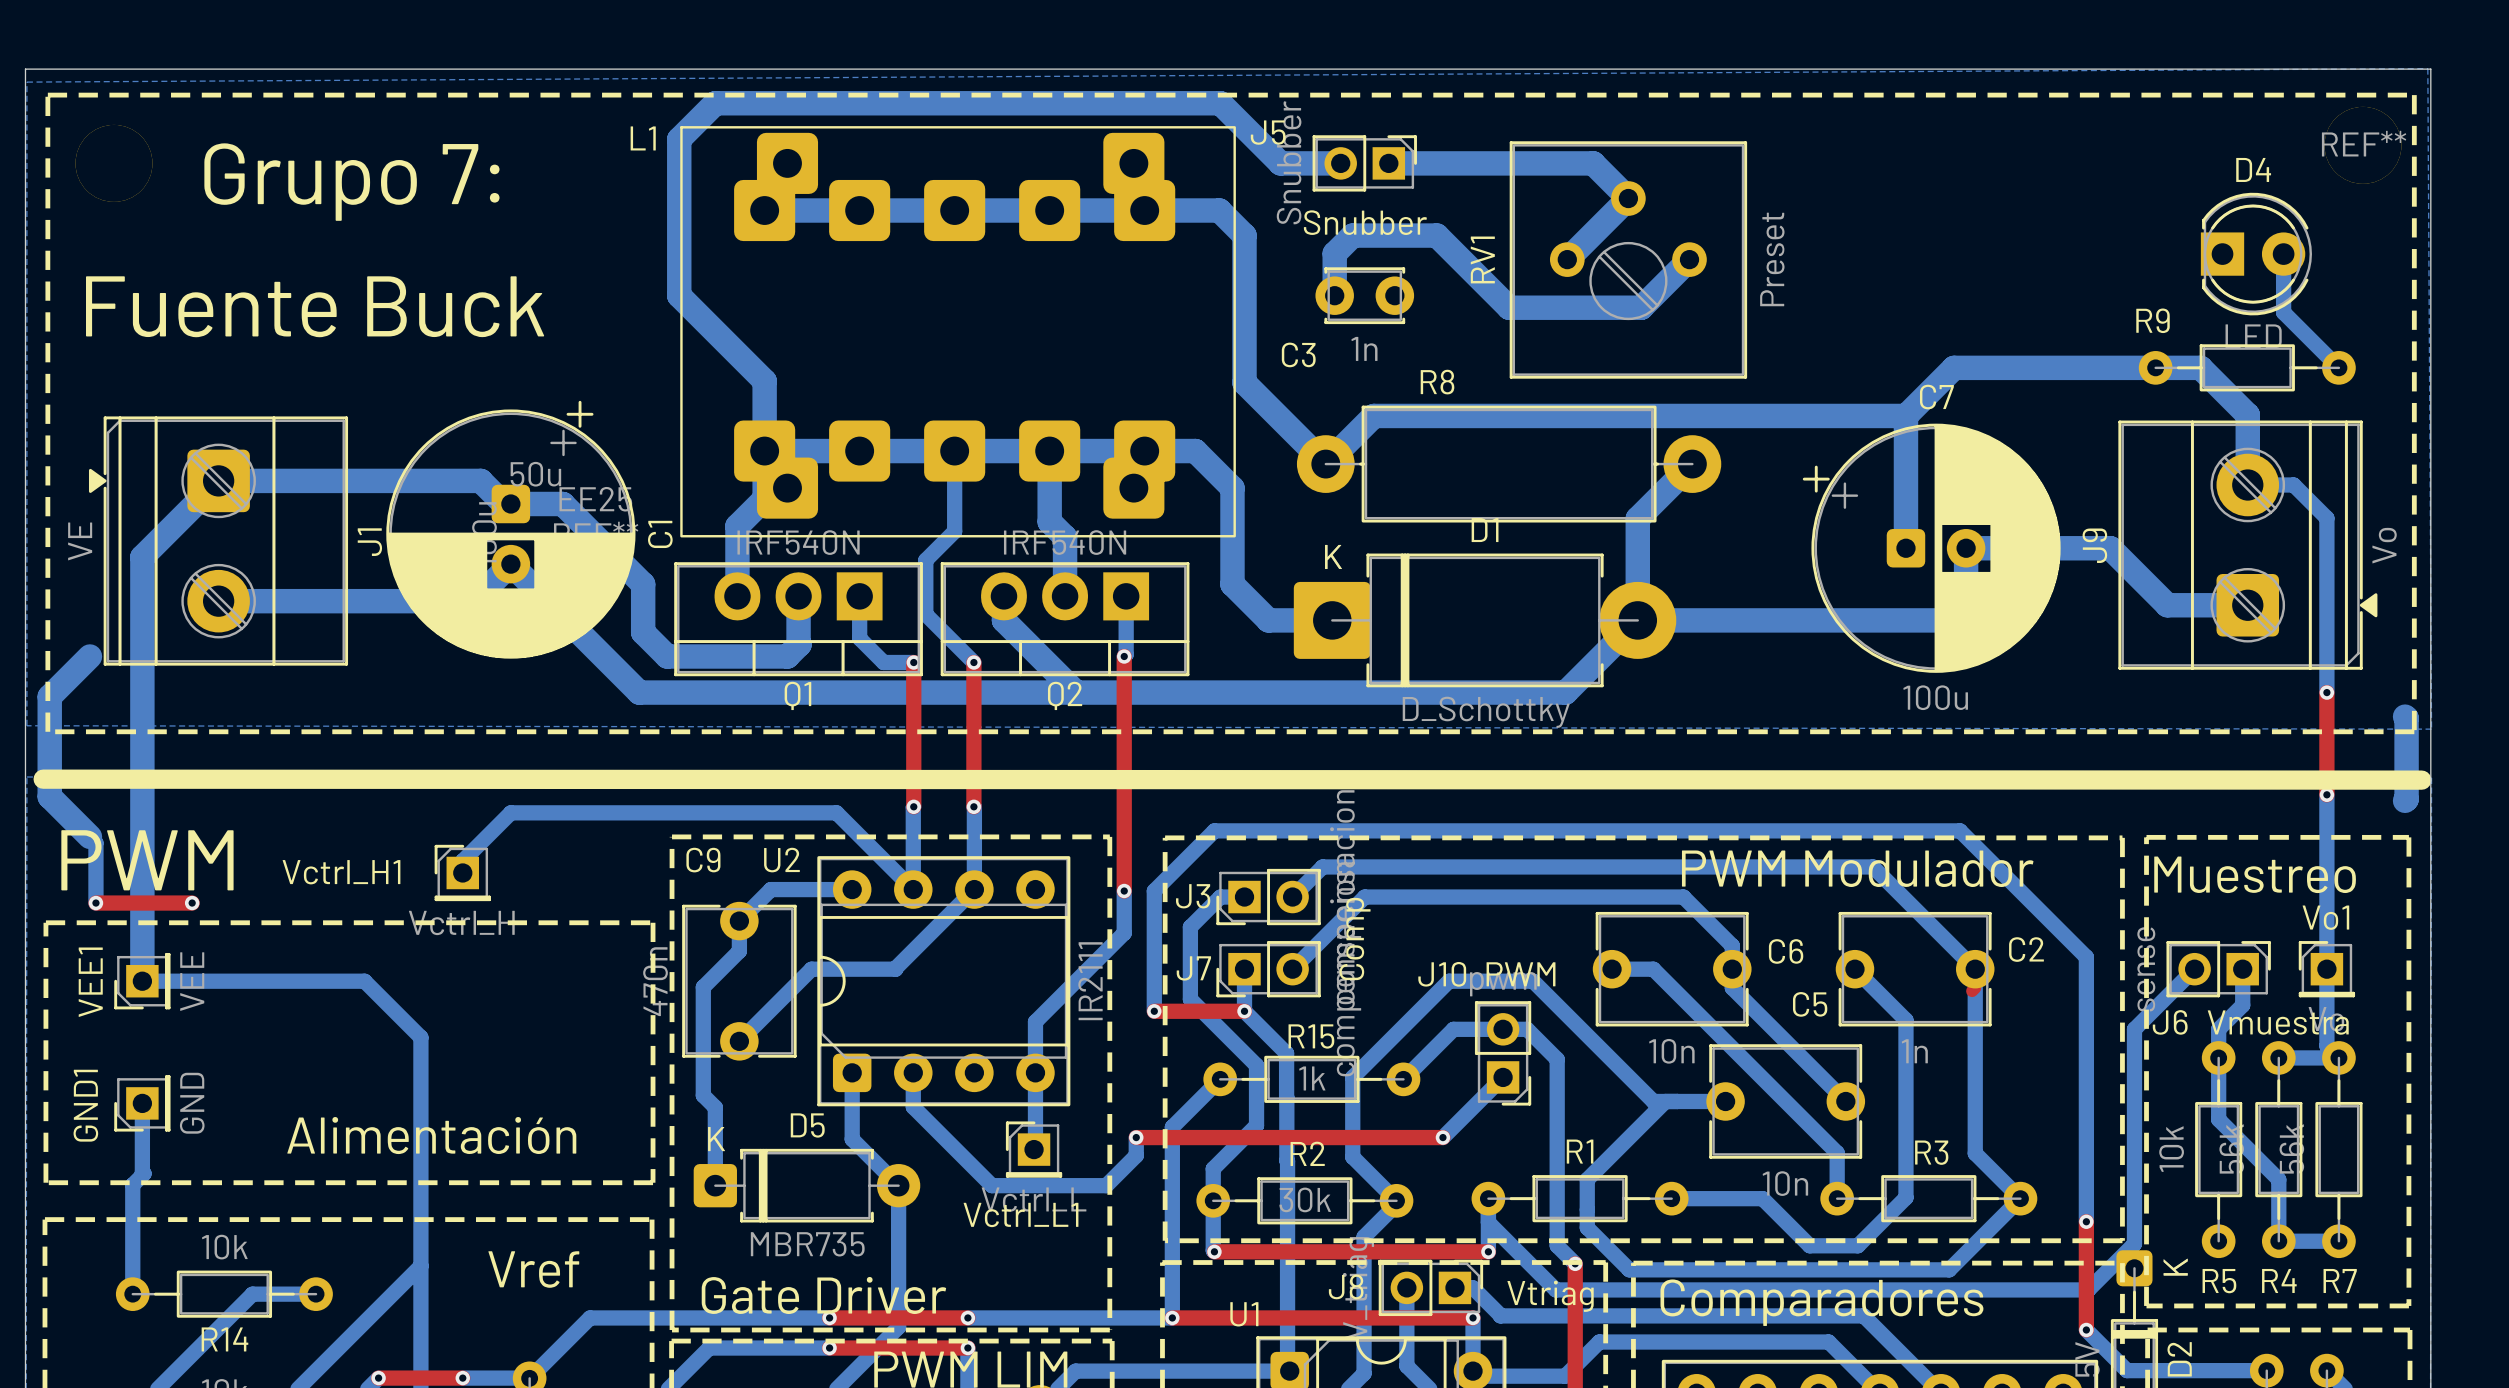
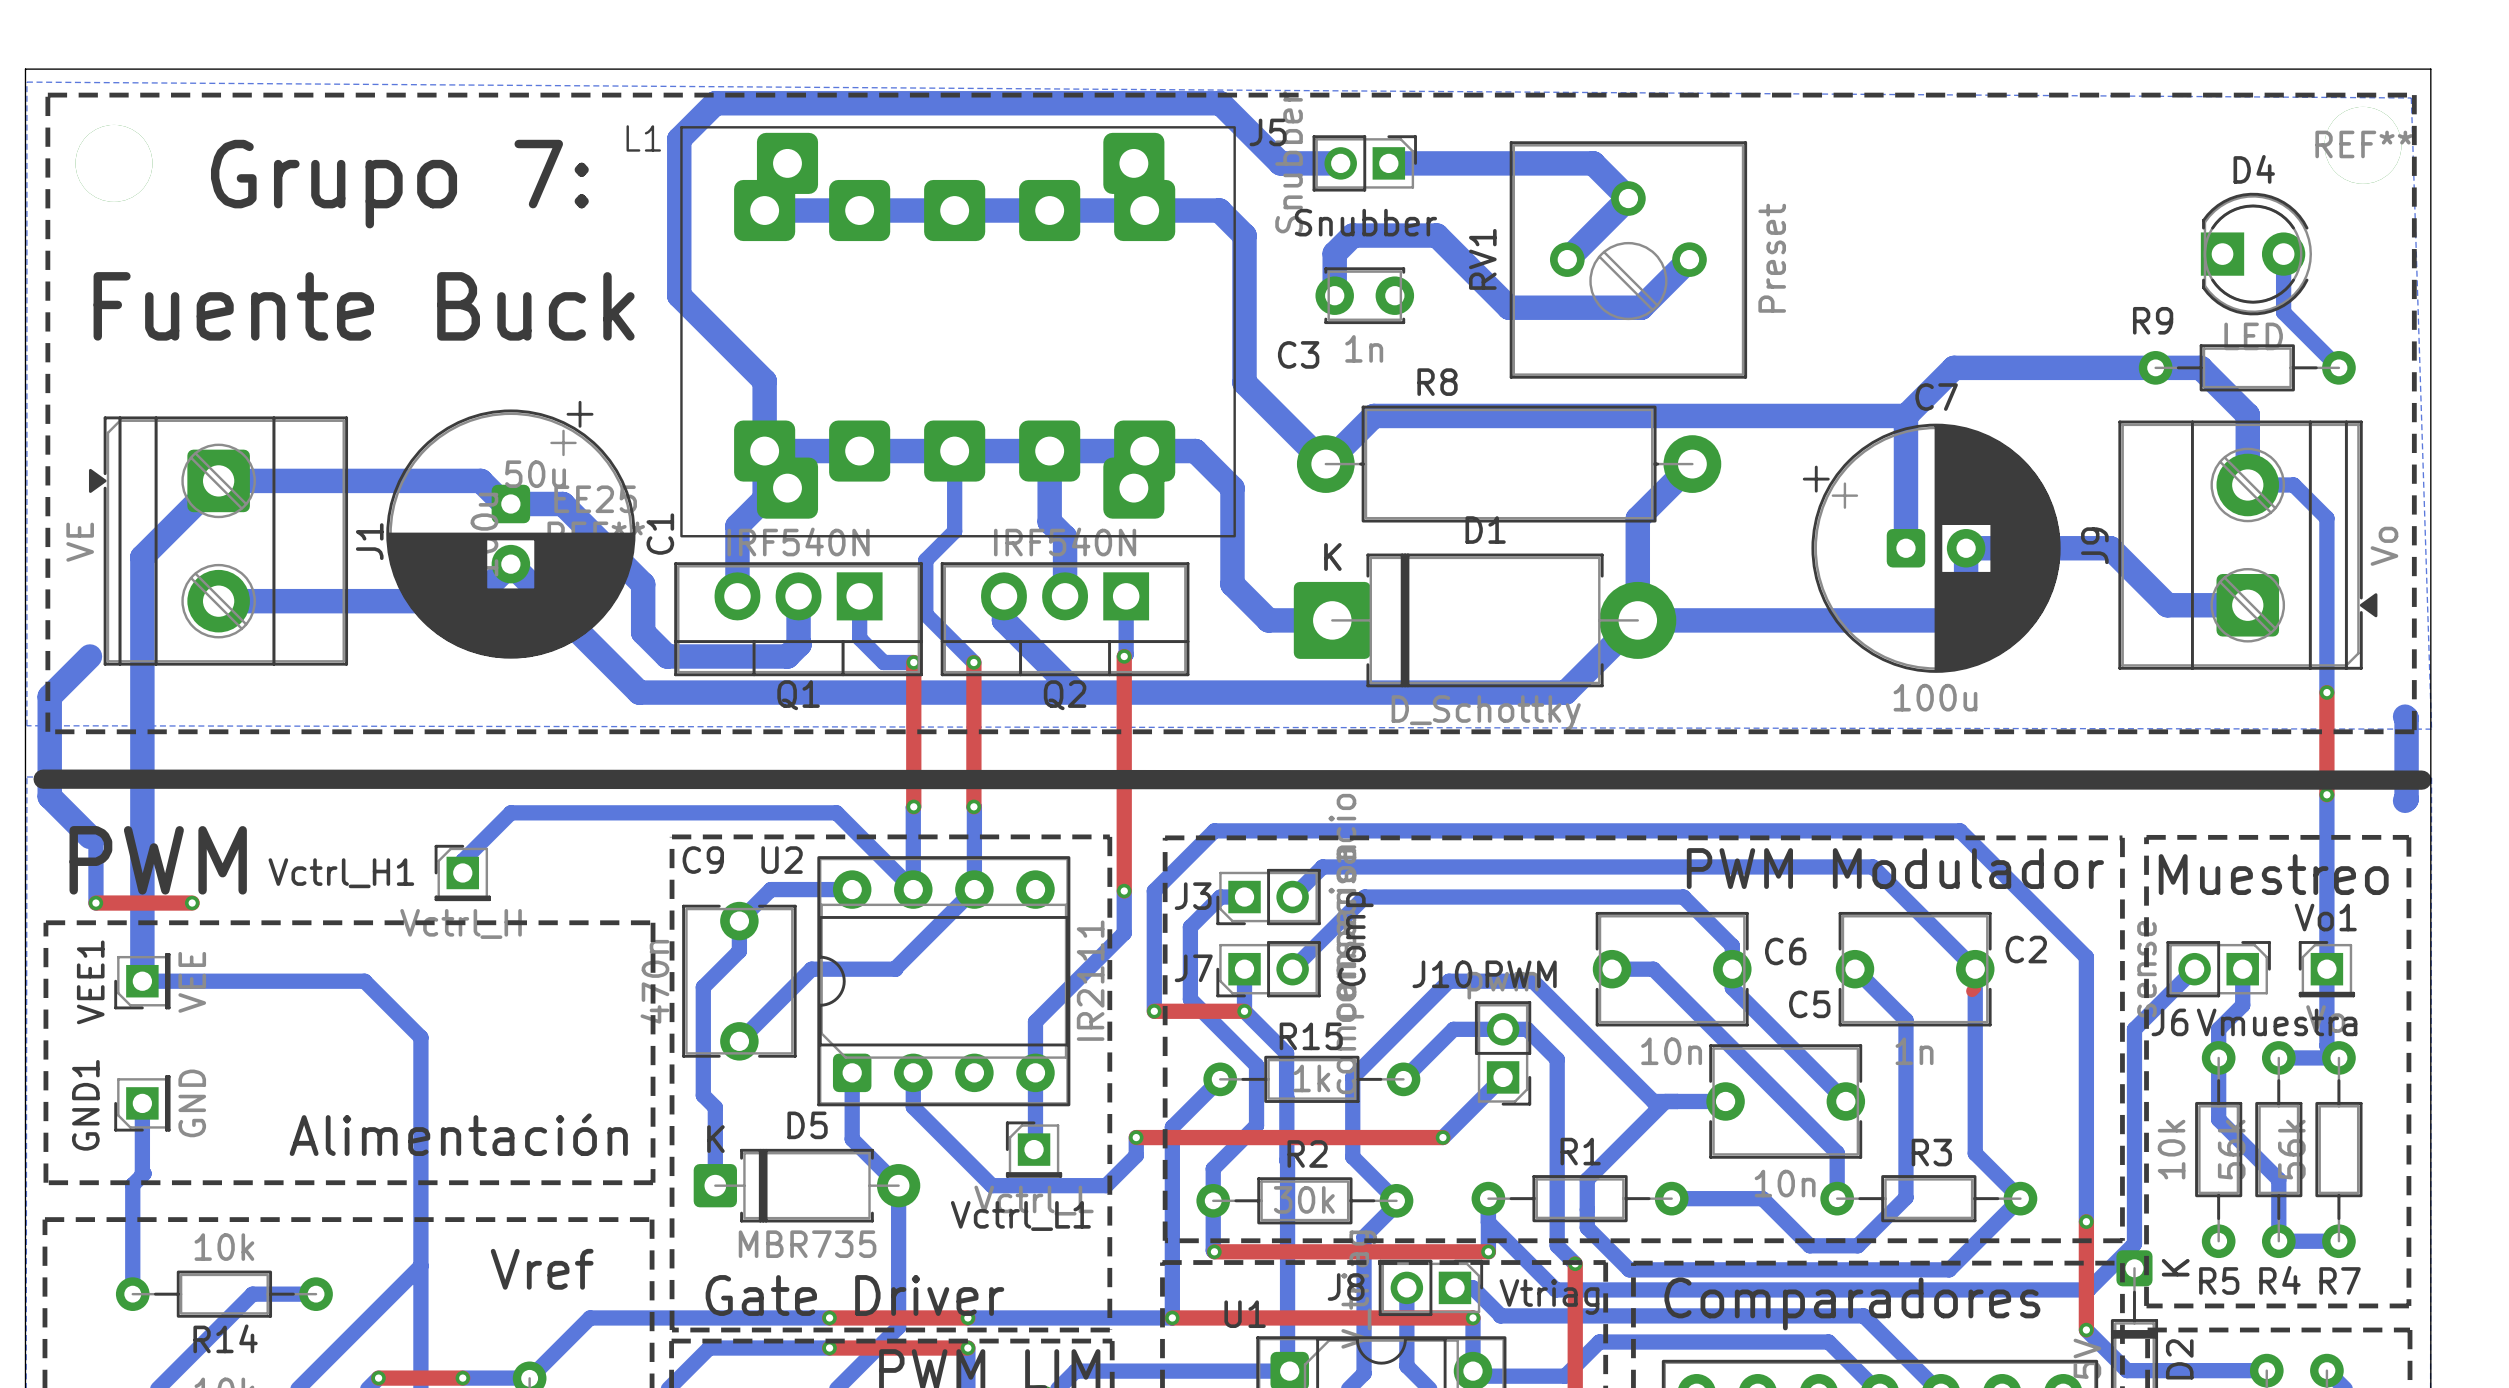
bottom zone outline: (26, 82) (2427, 68) (2431, 729) -> (26, 82) (2411, 97) (2431, 729)

